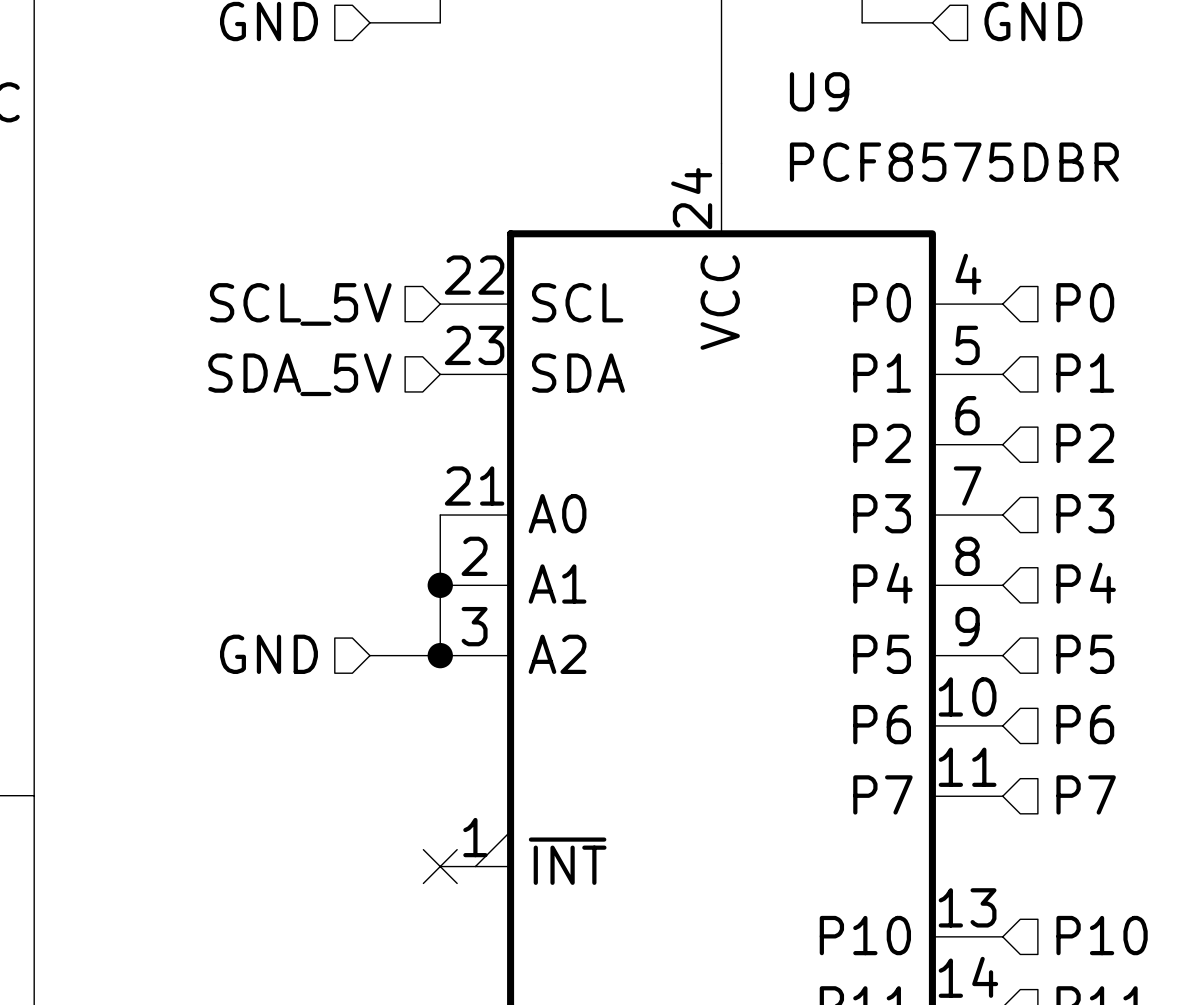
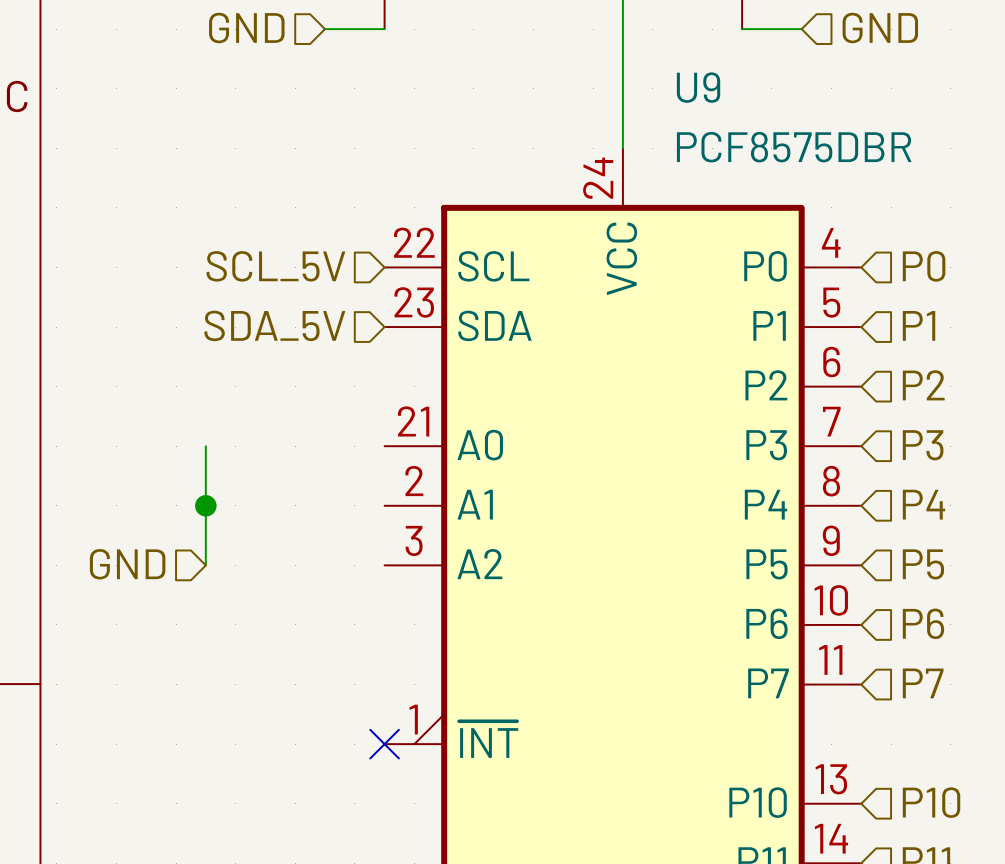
wire: none -> (205, 446) (205, 565)
wire: (440, 515) (440, 655) (369, 655) -> none
junction: none -> (205, 505)
junction: (440, 585) -> none
hierarchical label position: GND (268, 654) -> GND (127, 564)
junction: (440, 655) -> none

